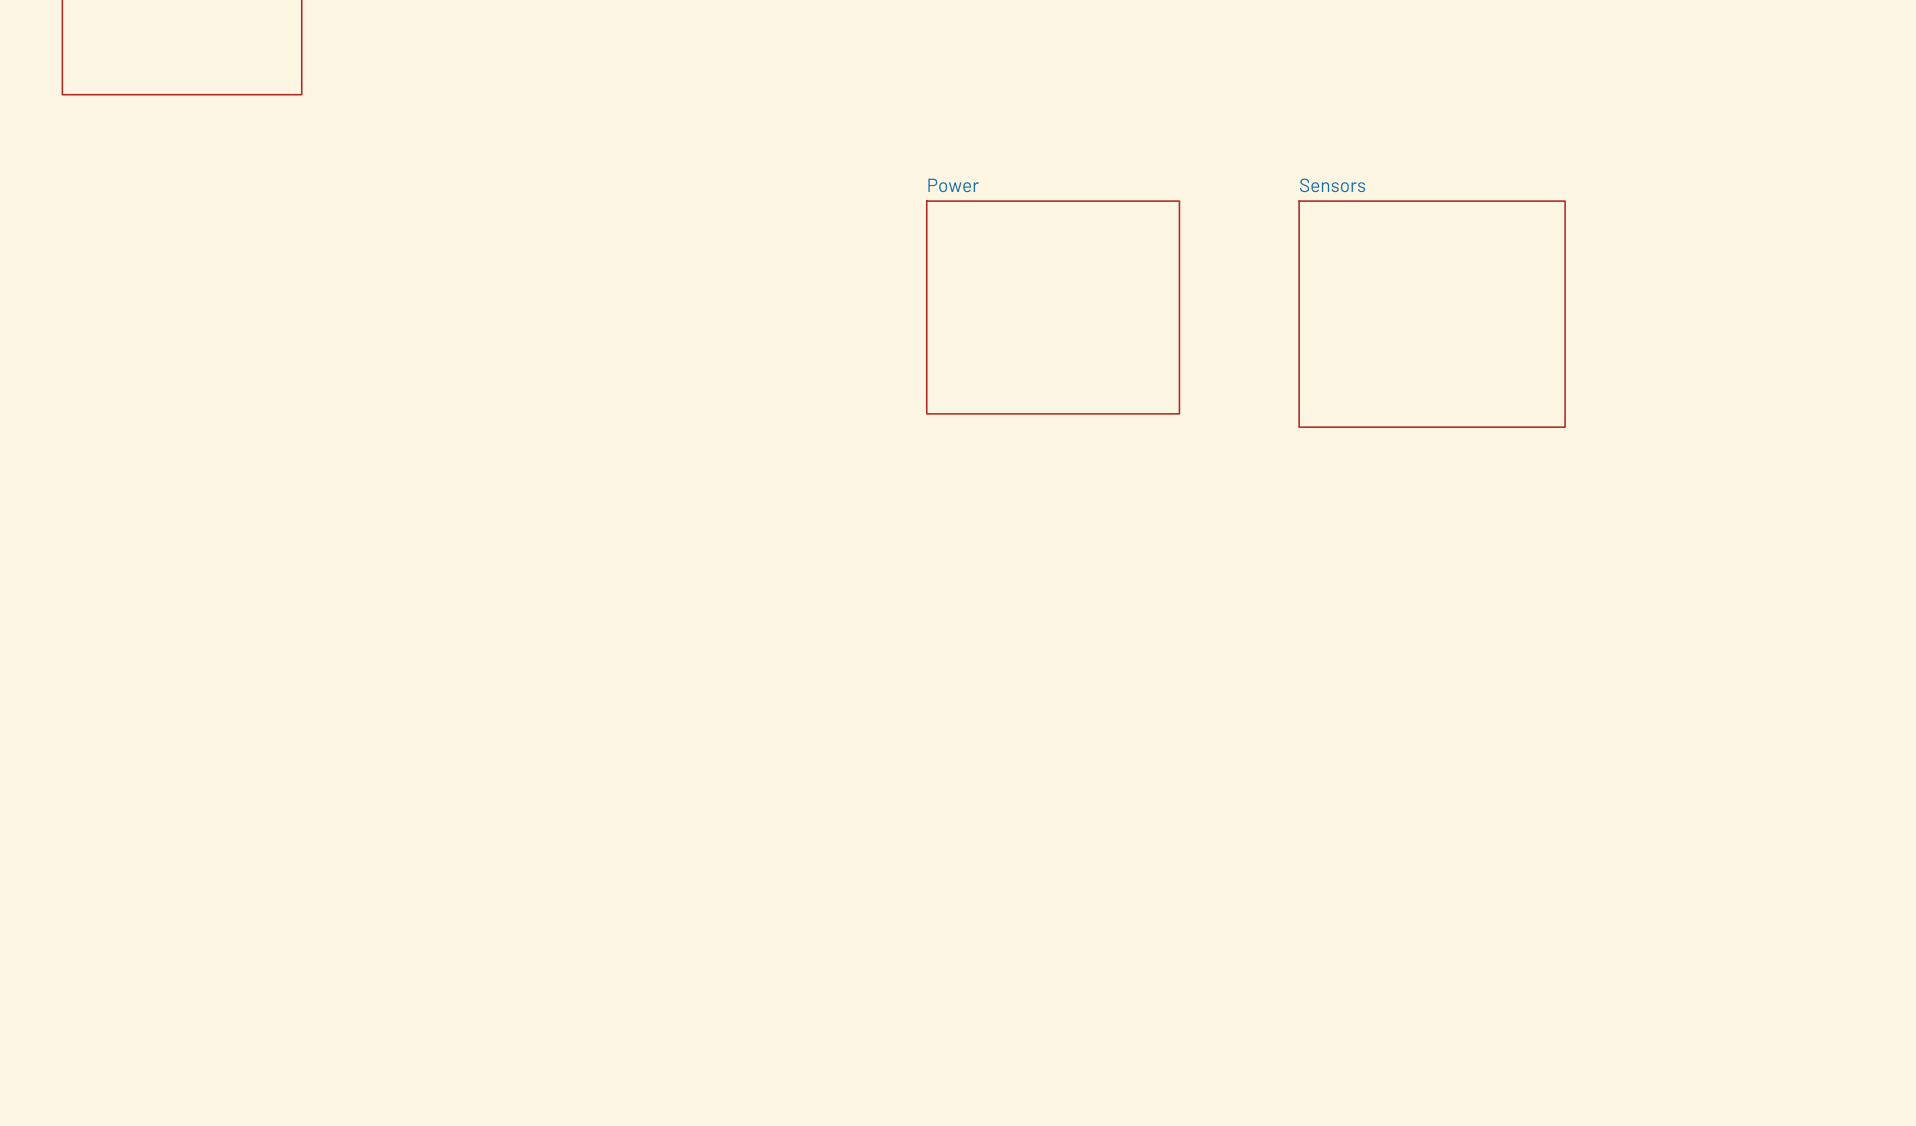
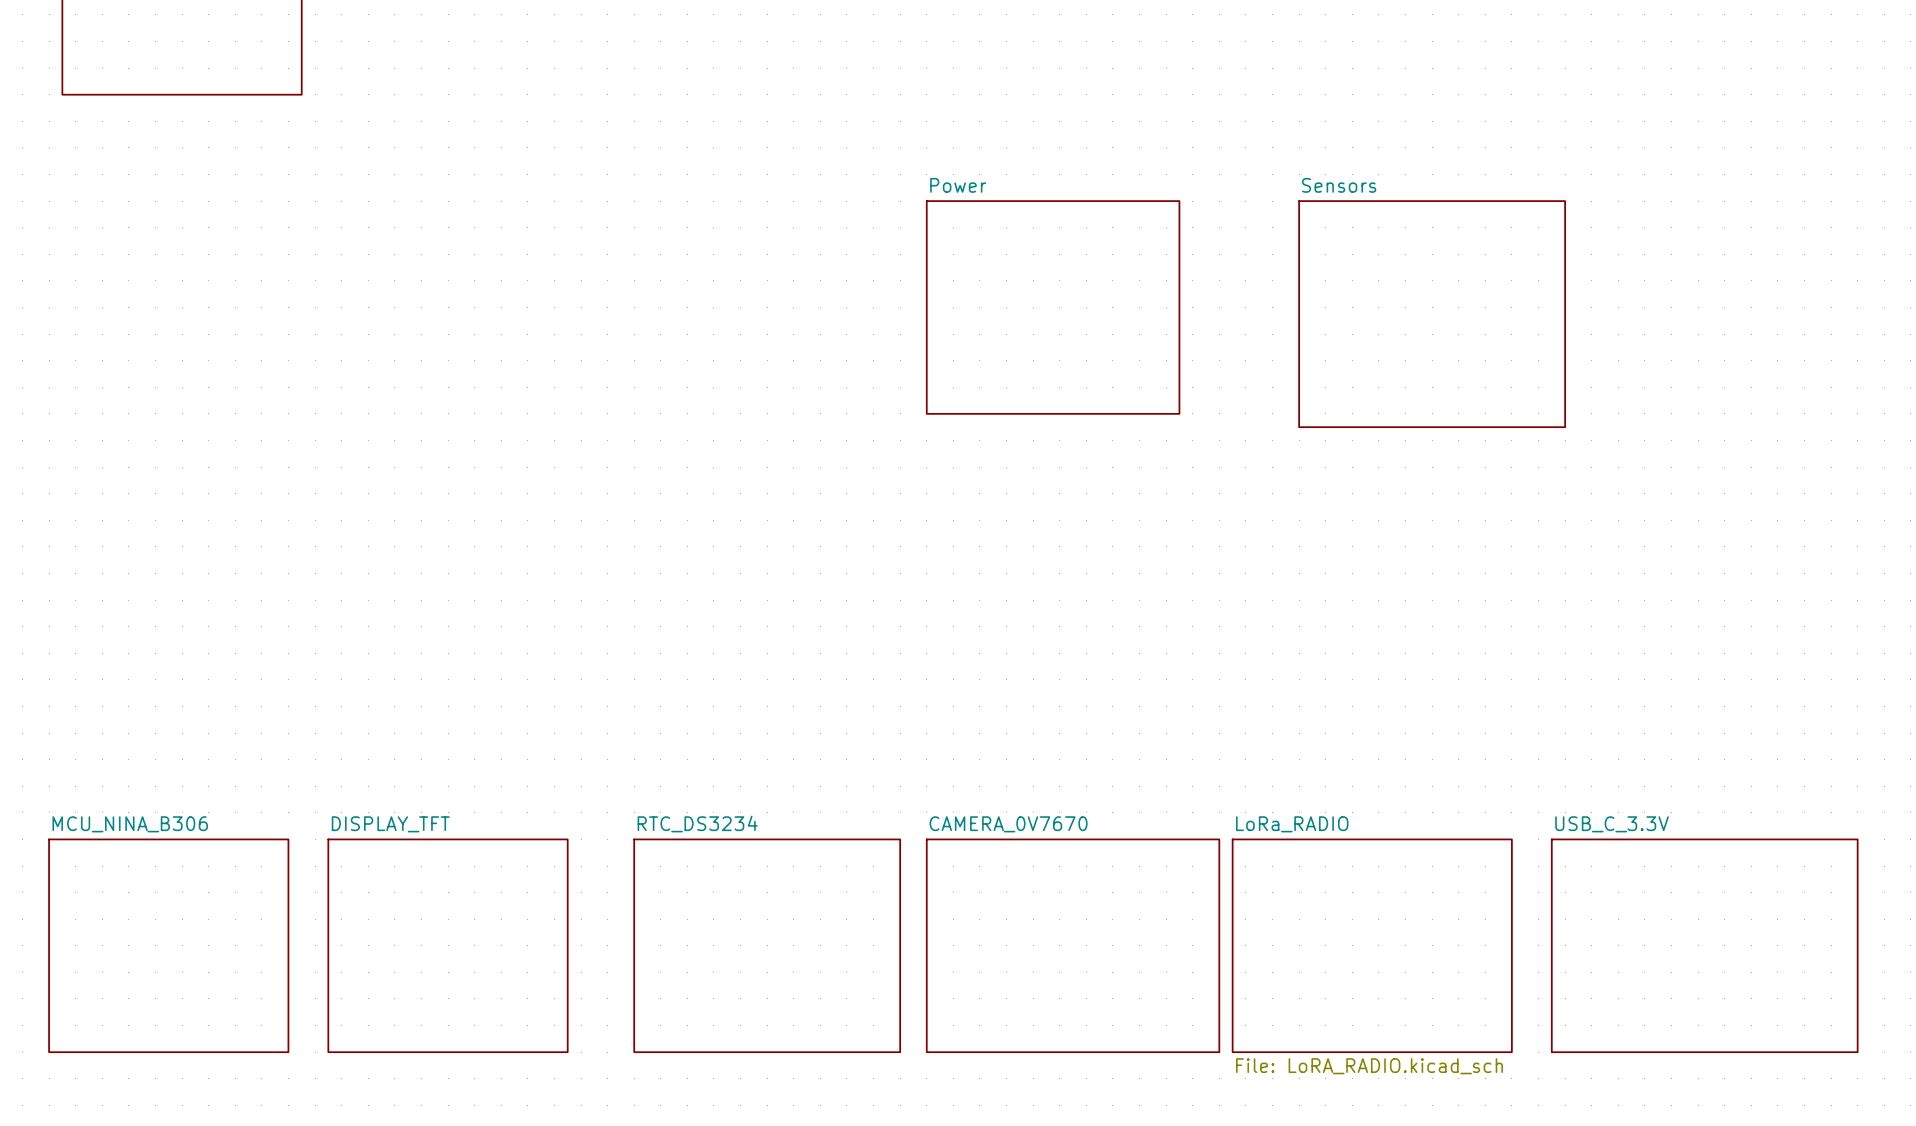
sheet MCU_NINA_B306: none -> (168, 945)
sheet DISPLAY_TFT: none -> (448, 945)
sheet RTC_DS3234: none -> (767, 945)
sheet CAMERA_0V7670: none -> (1073, 945)
sheet LoRa_RADIO: none -> File: LoRA_RADIO.kicad_sch (1372, 945)
sheet USB_C_3.3V: none -> (1704, 945)

